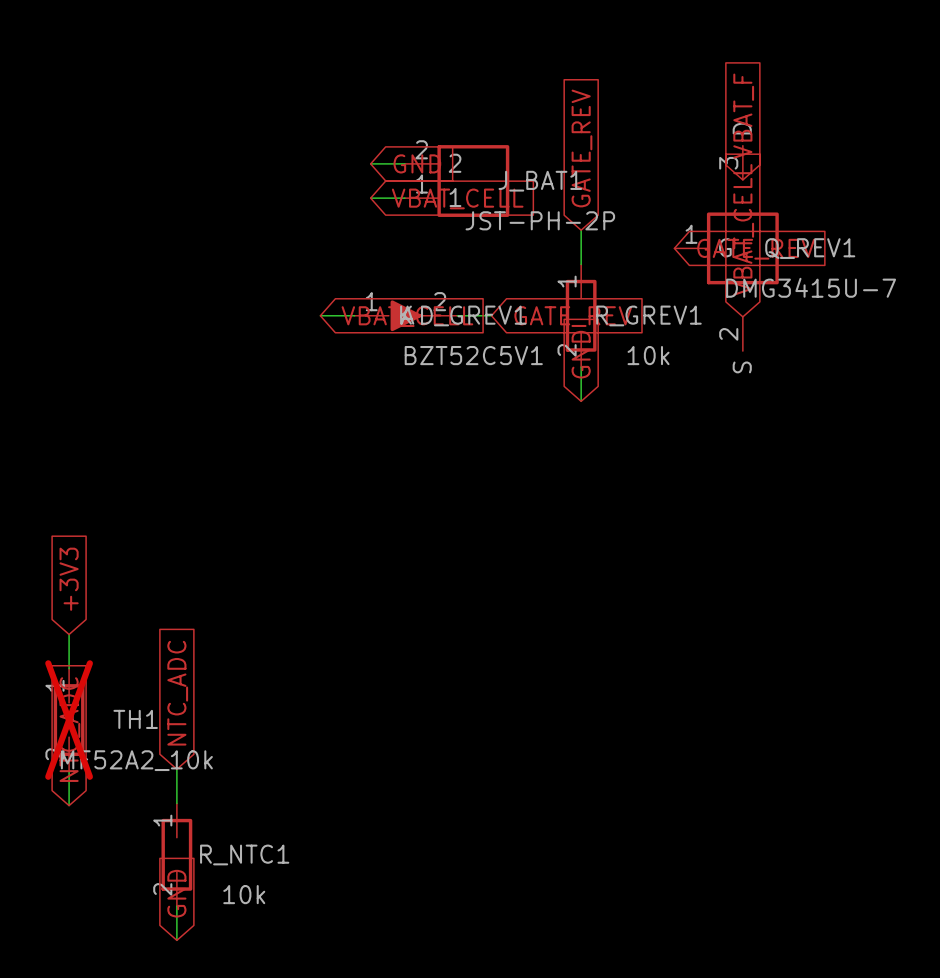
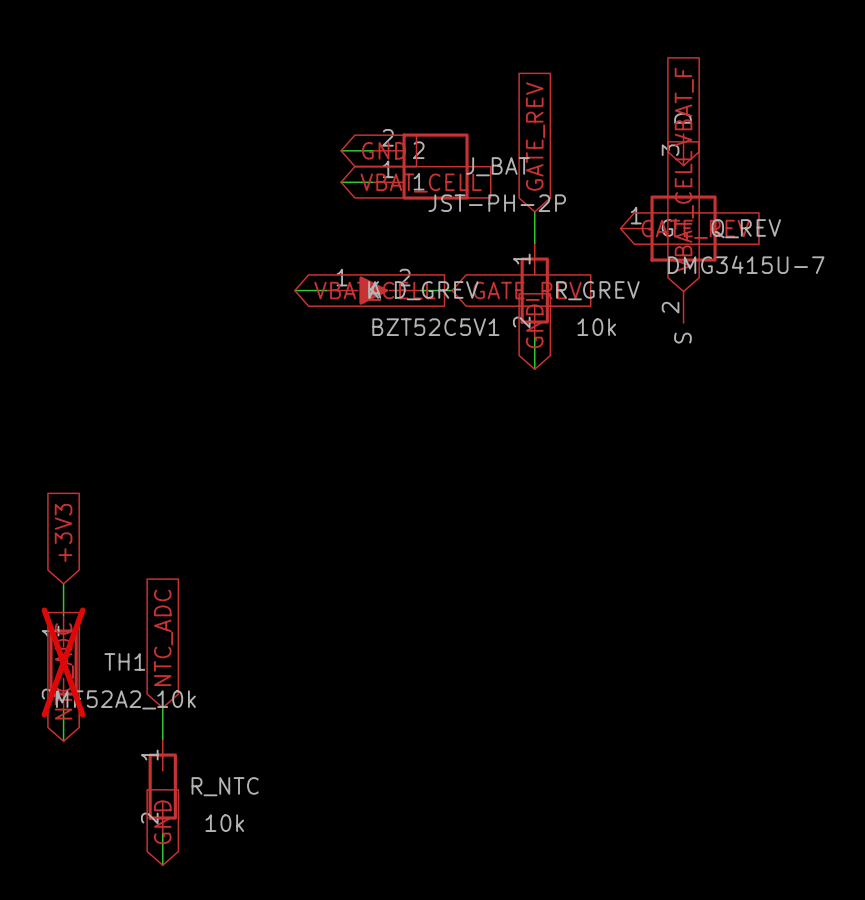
J_BAT1 name: J_BAT1 (540, 181) -> J_BAT (497, 166)
Q_REV1 name: Q_REV1 (810, 248) -> Q_REV (746, 228)
D_GREV1 name: D_GREV1 (473, 315) -> D_GREV (436, 290)
R_GREV1 name: R_GREV1 (648, 315) -> R_GREV (597, 290)
R_NTC1 name: R_NTC1 (244, 854) -> R_NTC (225, 786)

